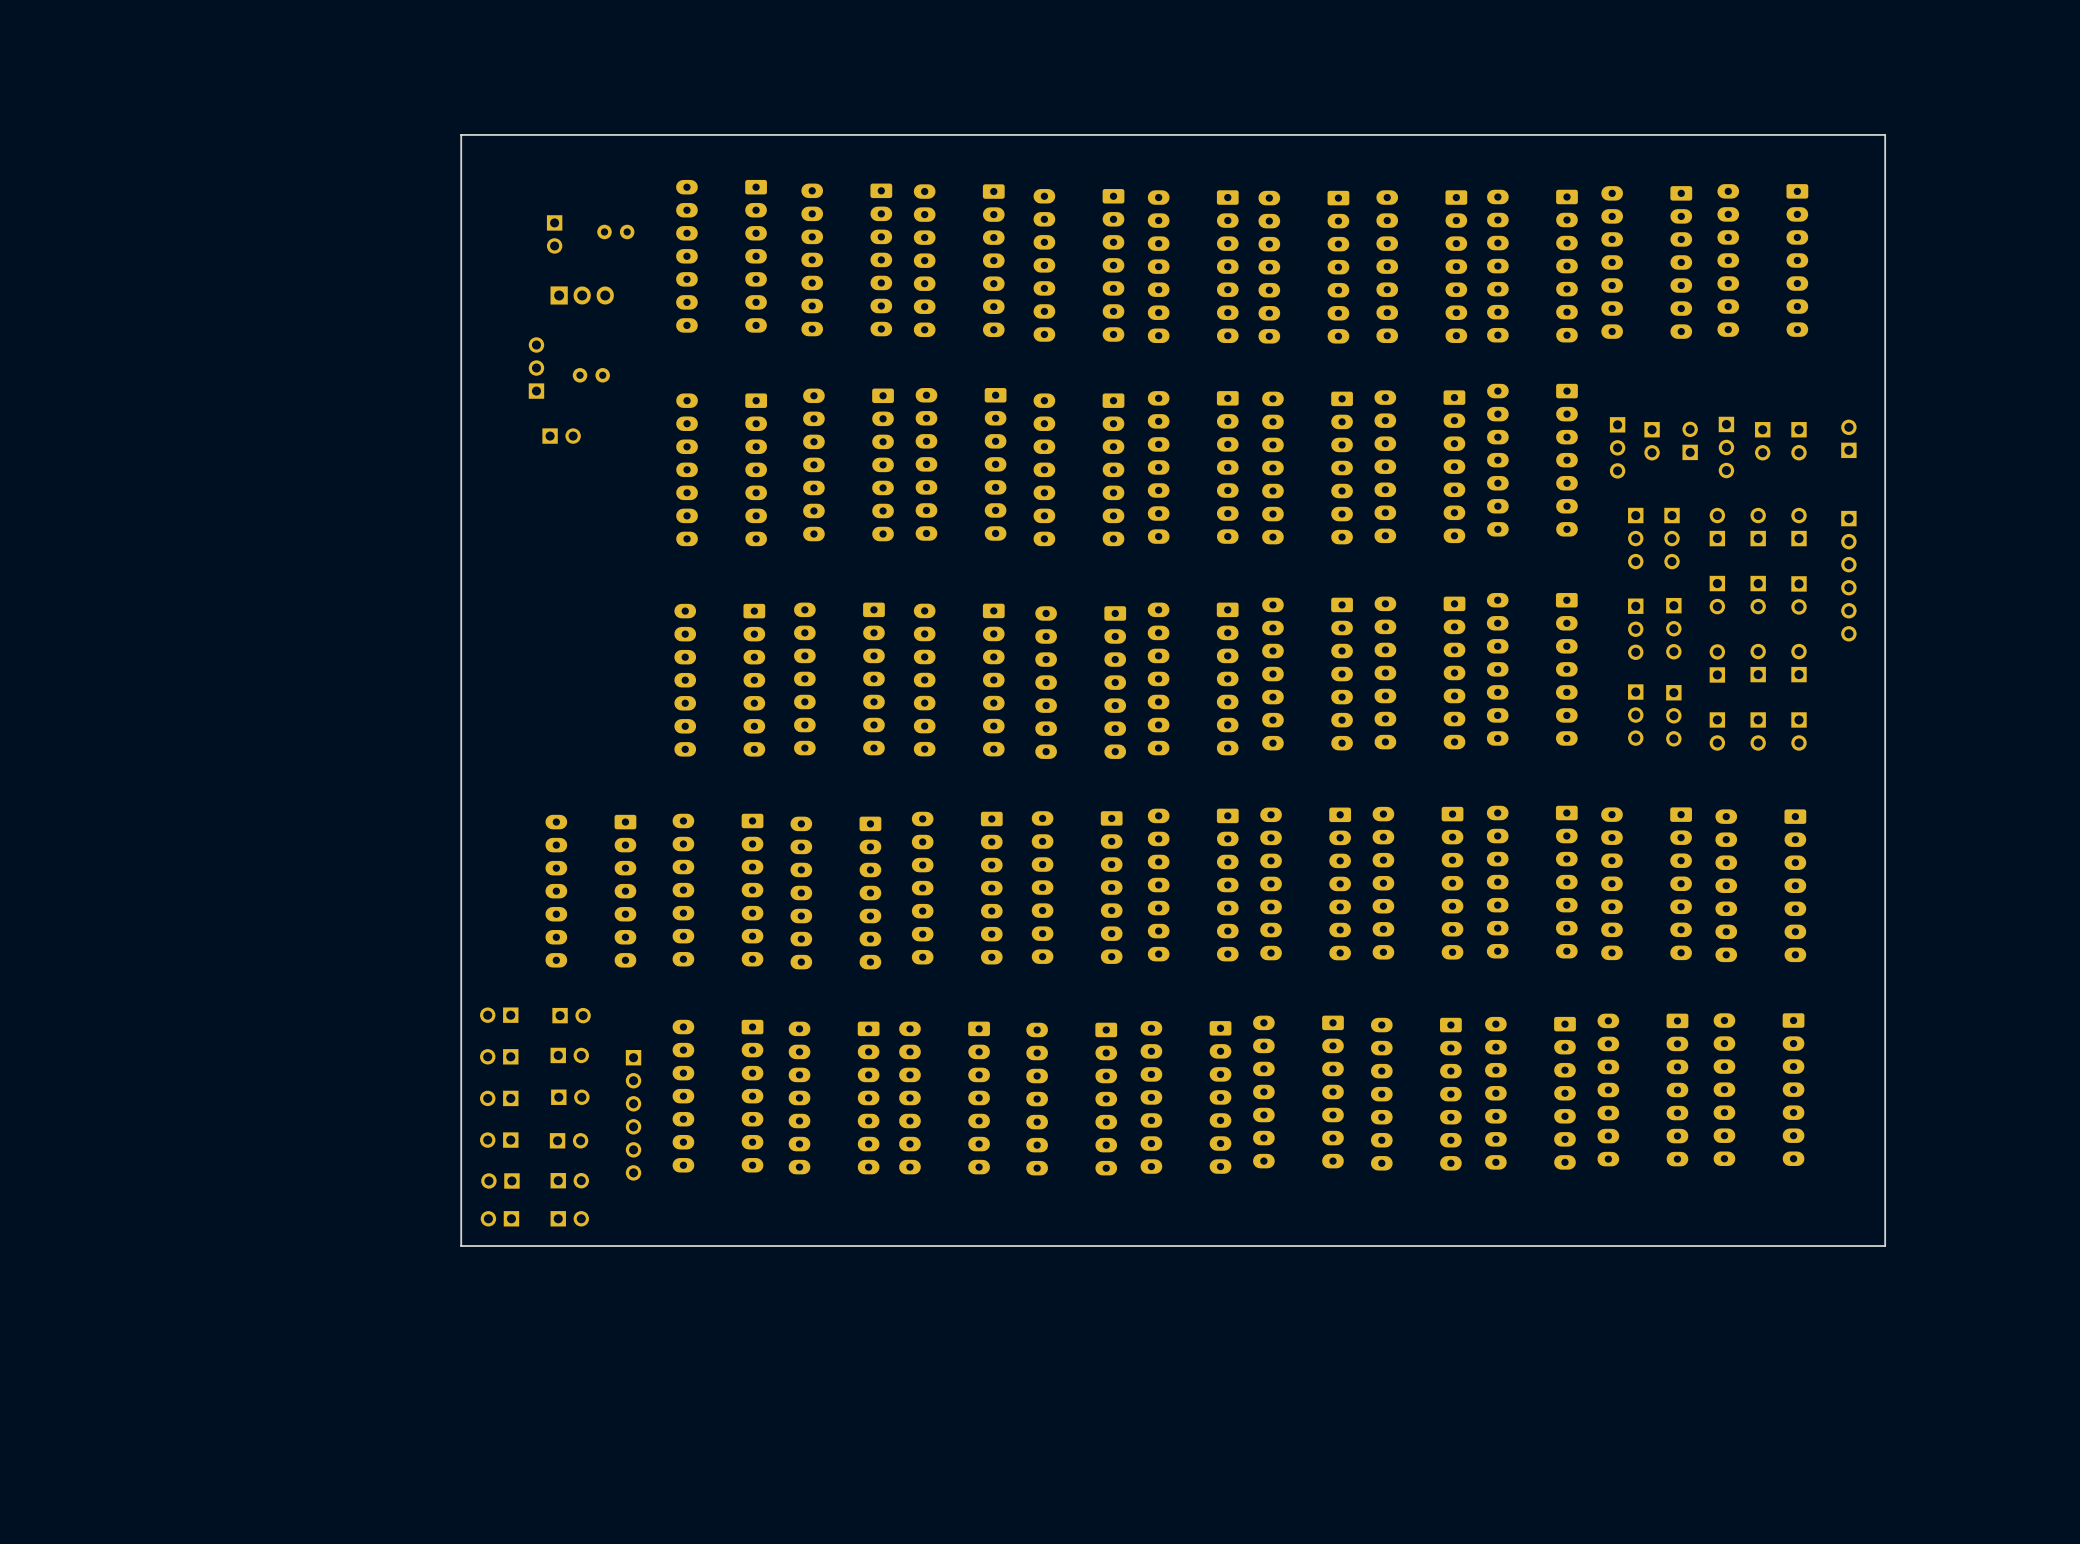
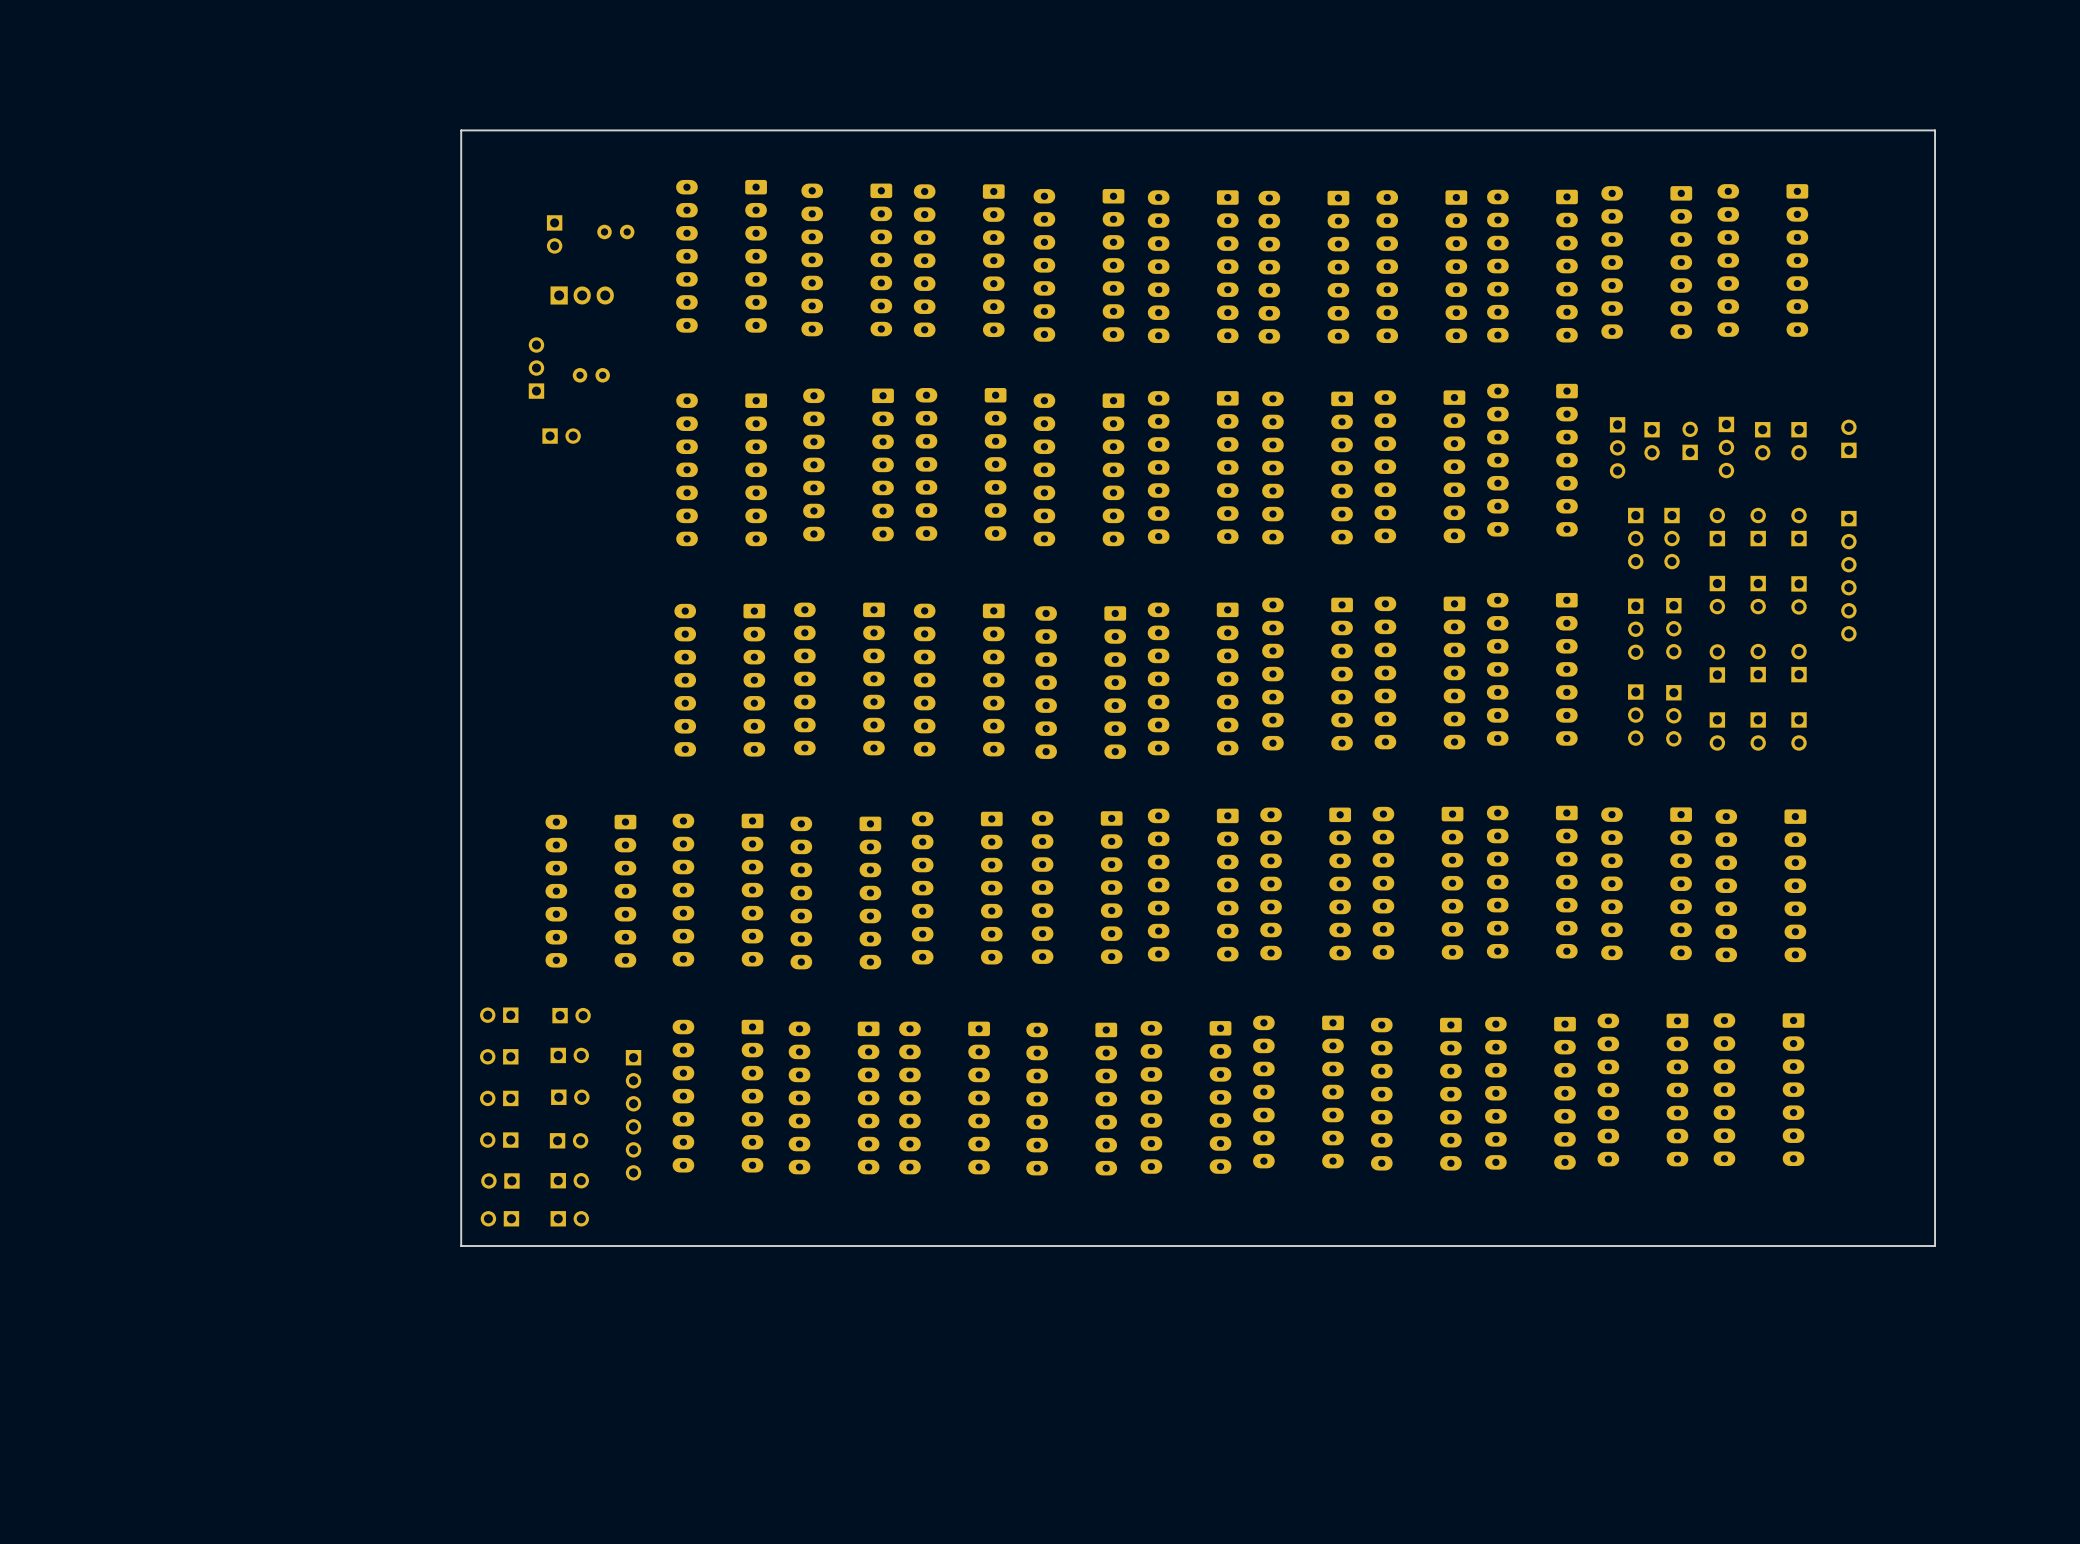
board edge: (461, 134) (1885, 134) (1885, 1245) -> (461, 134) (461, 130) (1935, 130) (1935, 1245) (1885, 1245)

